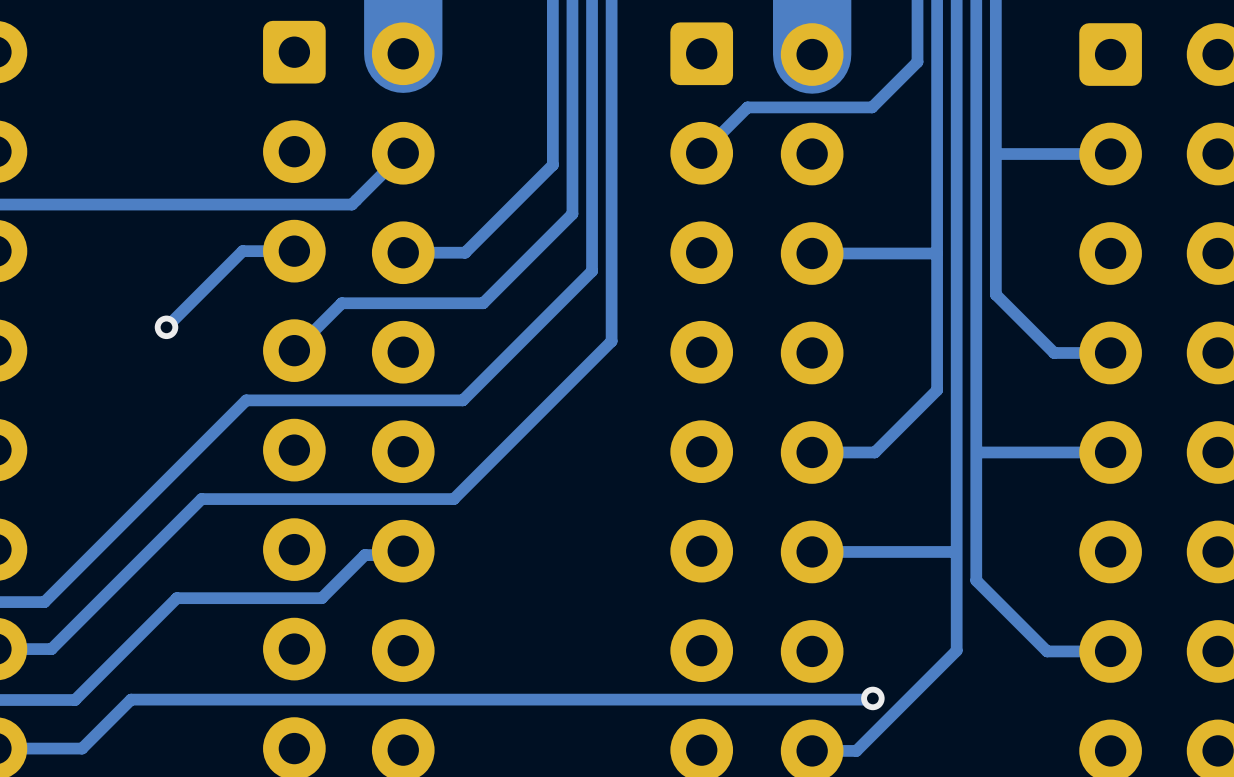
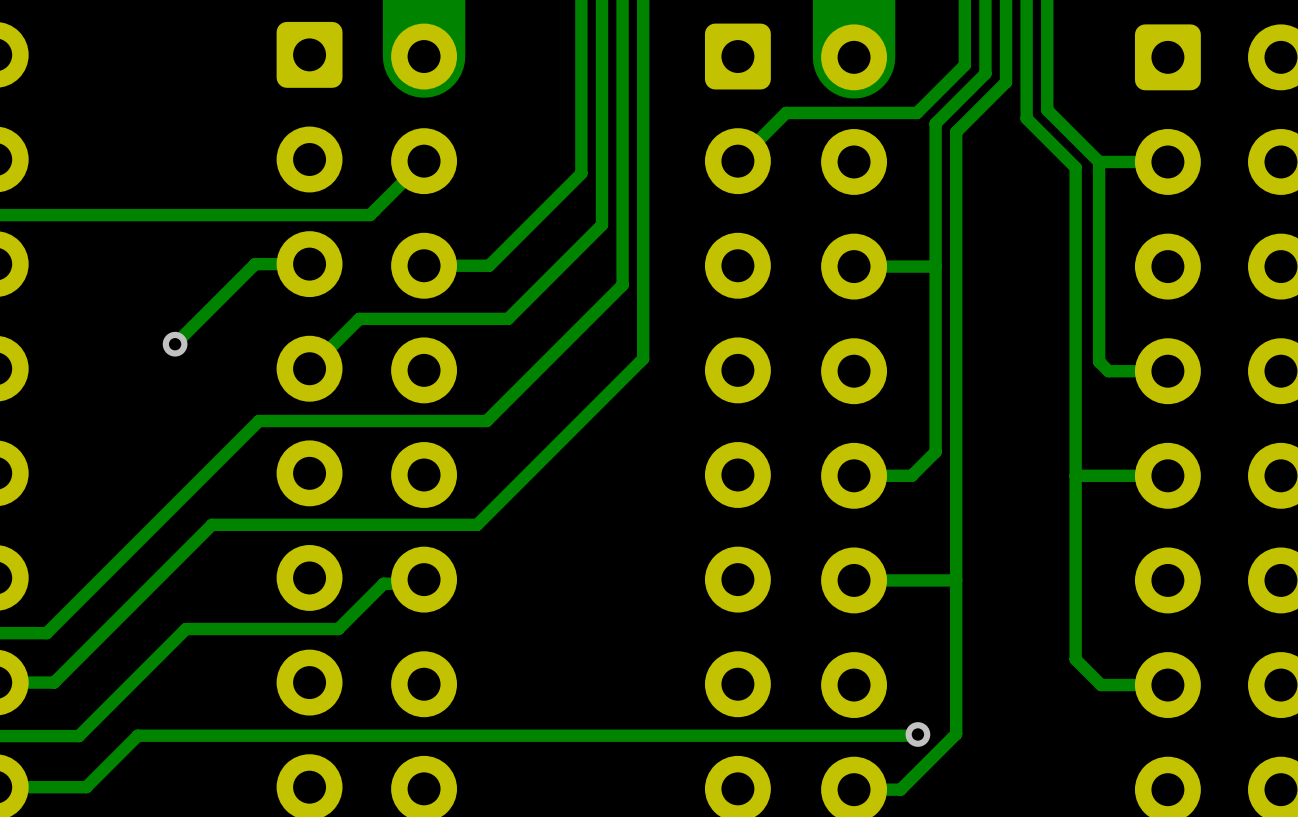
track: (937, 70) (937, 390) (874, 452) (866, 452) -> (985, 73) (935, 123) (935, 451) (911, 475)
track: (956, 78) (956, 650) (909, 698) -> (1006, 82) (956, 132) (956, 734)
track: (995, 104) (995, 294) (1045, 343) -> (1047, 110) (1099, 161) (1099, 361)
track: (976, 112) (976, 580) (1022, 627) -> (1026, 118) (1075, 167) (1075, 659)
track: (1045, 154) (997, 154) -> none
track: (936, 253) (889, 253) -> none
track: (1022, 452) (977, 452) -> none
track: (955, 551) (909, 551) -> none

